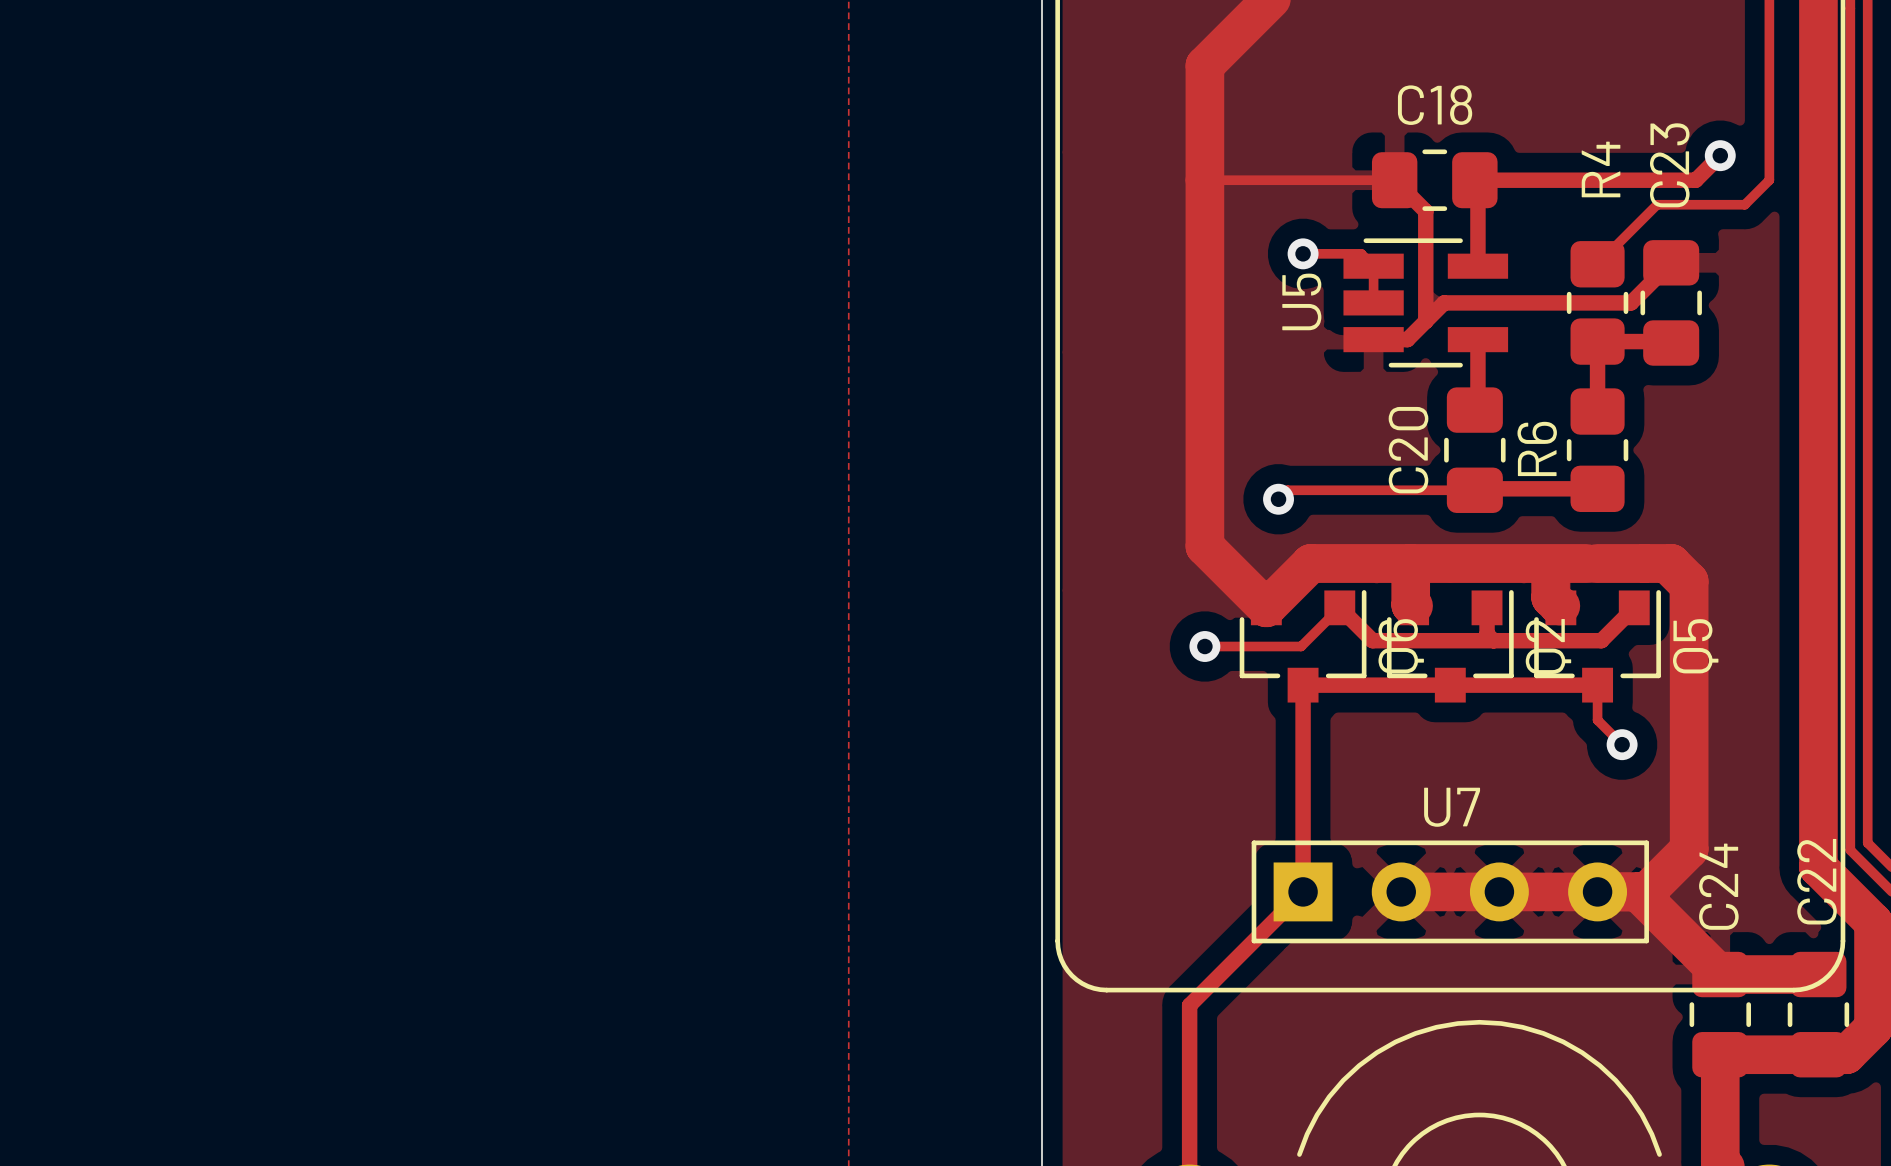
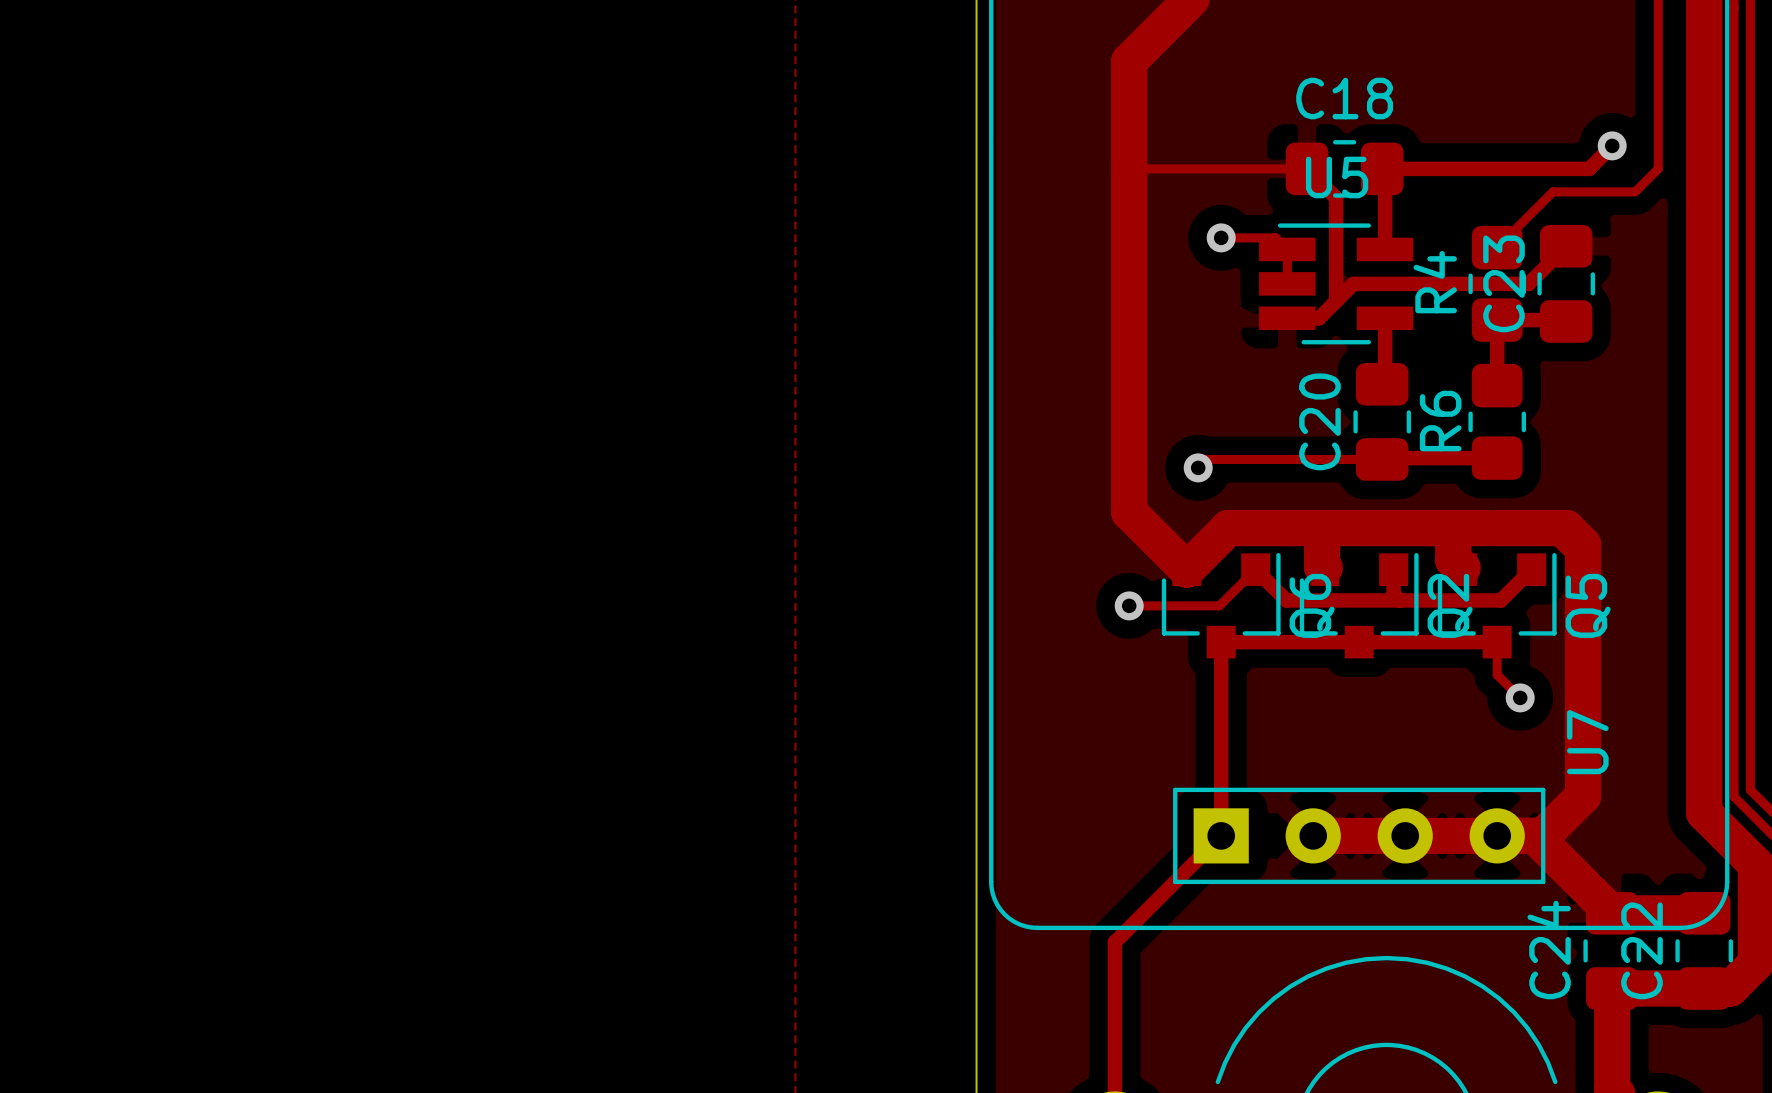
C23 name position: C23 (1669, 165) -> C23 (1504, 283)
R4 name position: R4 (1601, 169) -> R4 (1435, 282)
U5 name rotation: 0° (1301, 301) -> 90° clockwise (1337, 177)
U5 name position: U5 (1301, 301) -> U5 (1337, 177)
U7 name rotation: 0° (1452, 807) -> 90° counterclockwise (1587, 742)
U7 name position: U7 (1452, 807) -> U7 (1587, 742)
C22 name position: C22 (1817, 881) -> C22 (1642, 950)
C24 name position: C24 (1718, 886) -> C24 (1549, 950)

